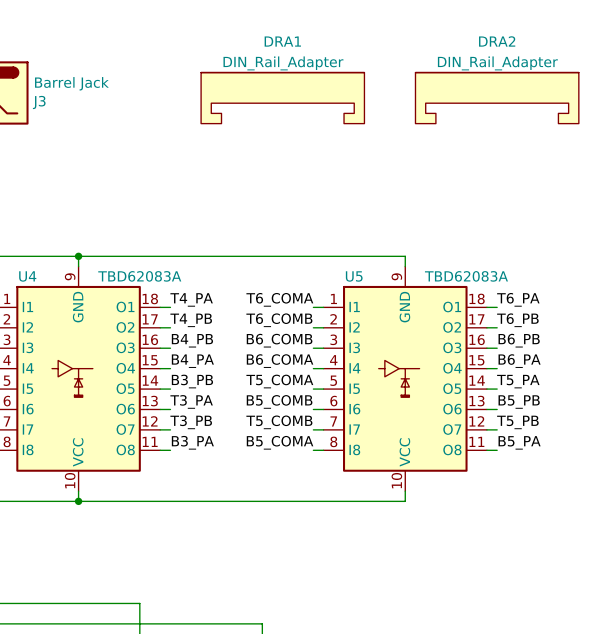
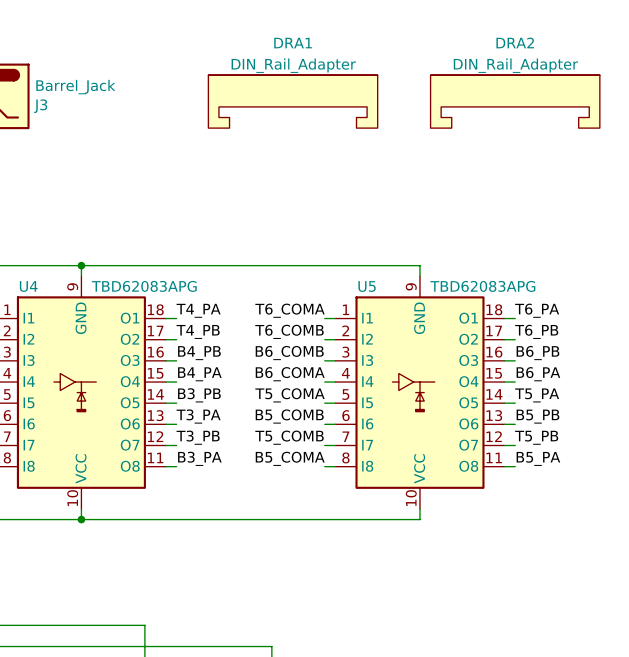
J3 value: Barrel Jack (71, 83) -> Barrel_Jack (75, 87)
U4 value: TBD62083A (139, 276) -> TBD62083APG (144, 286)
U5 value: TBD62083A (466, 276) -> TBD62083APG (482, 286)

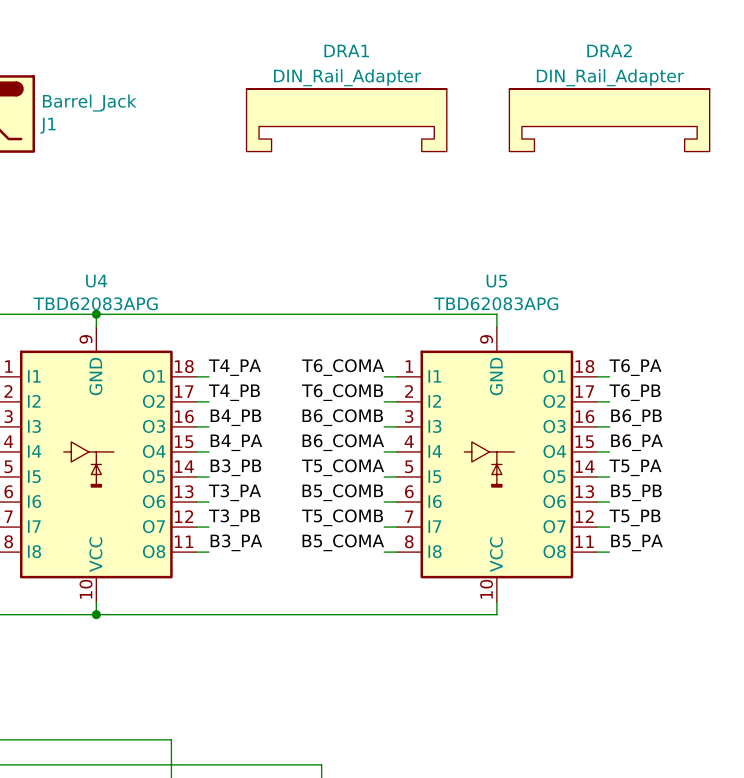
J3 name: J3 (40, 106) -> J1 (48, 125)
U4 name position: U4 (28, 286) -> U4 (96, 281)
U4 value position: TBD62083APG (144, 286) -> TBD62083APG (95, 303)
U5 name position: U5 (367, 286) -> U5 (496, 281)
U5 value position: TBD62083APG (482, 286) -> TBD62083APG (496, 303)

